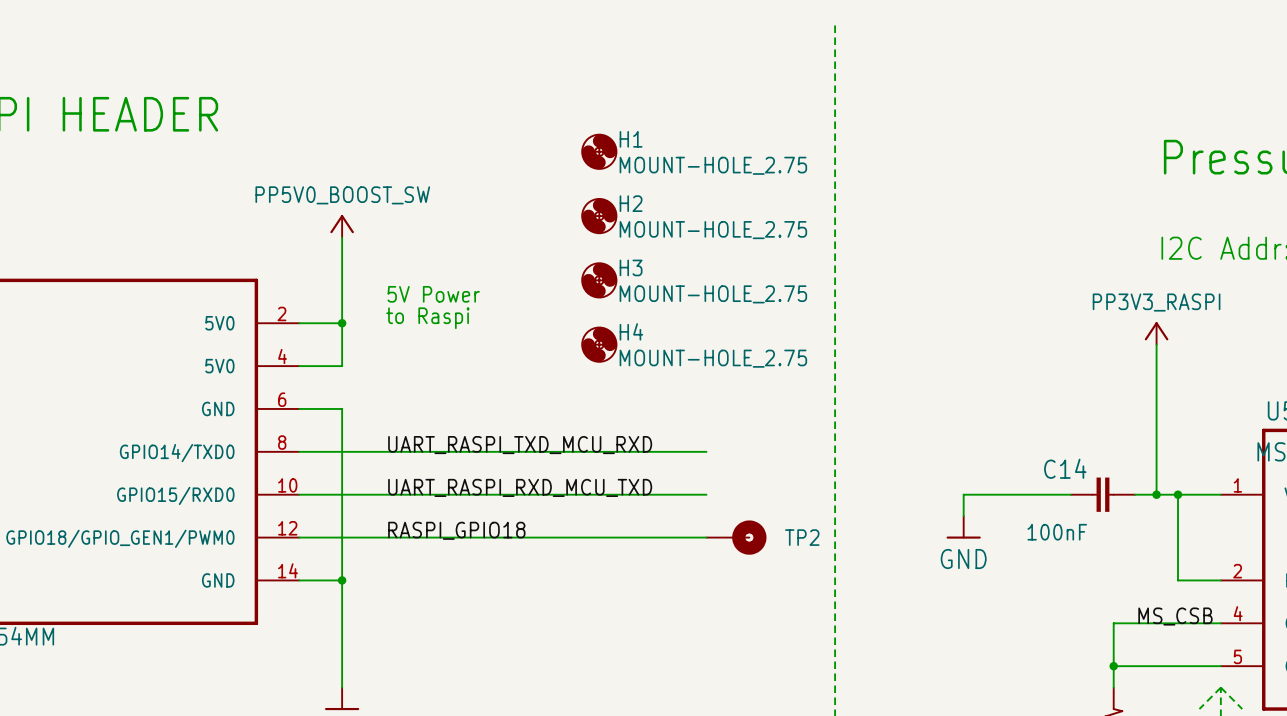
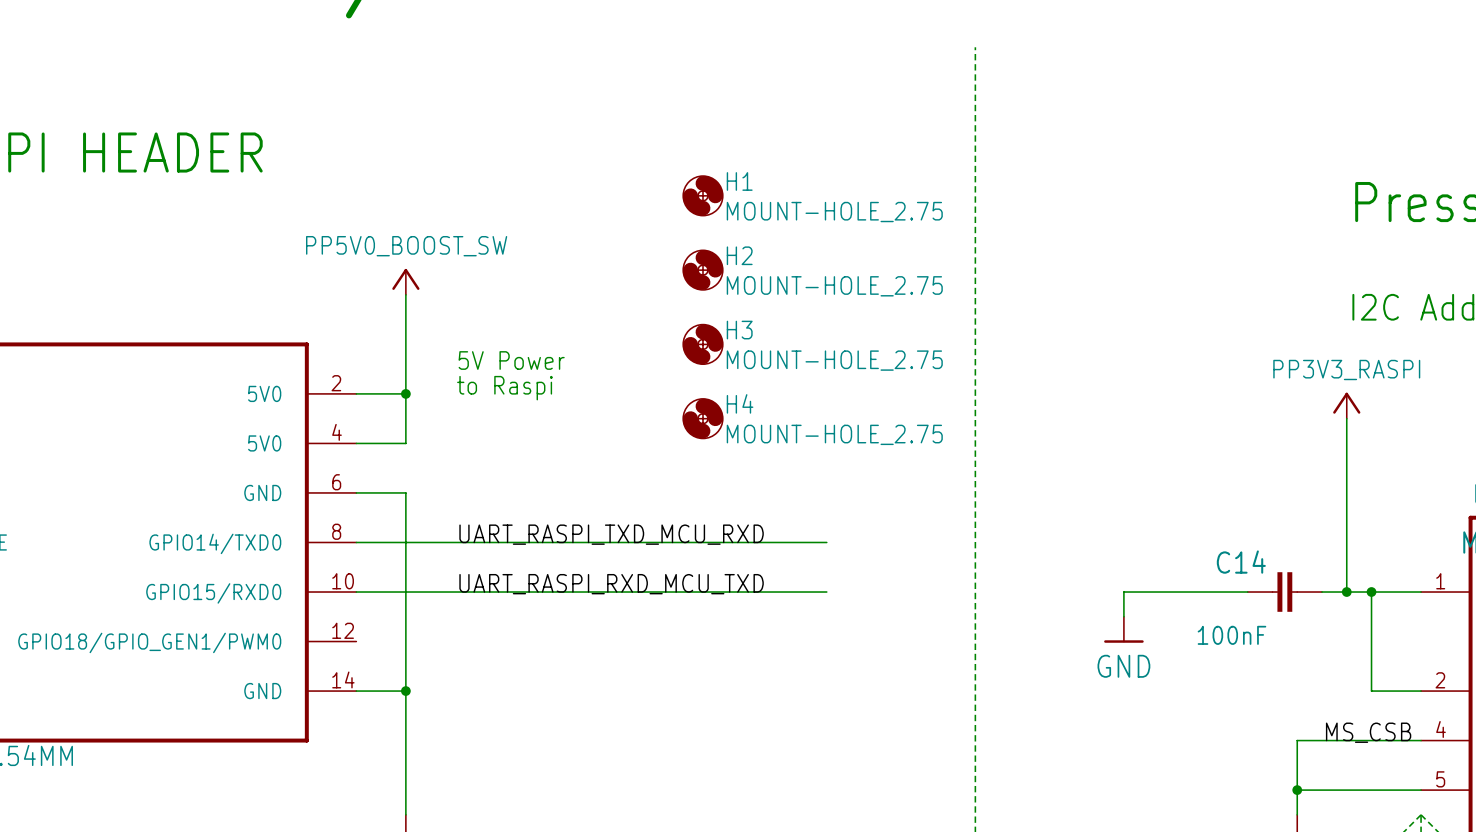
label: RASPI_GPIO18 (456, 530) -> none
wire: (299, 537) (706, 537) -> none
TP2: (736, 537) -> none

